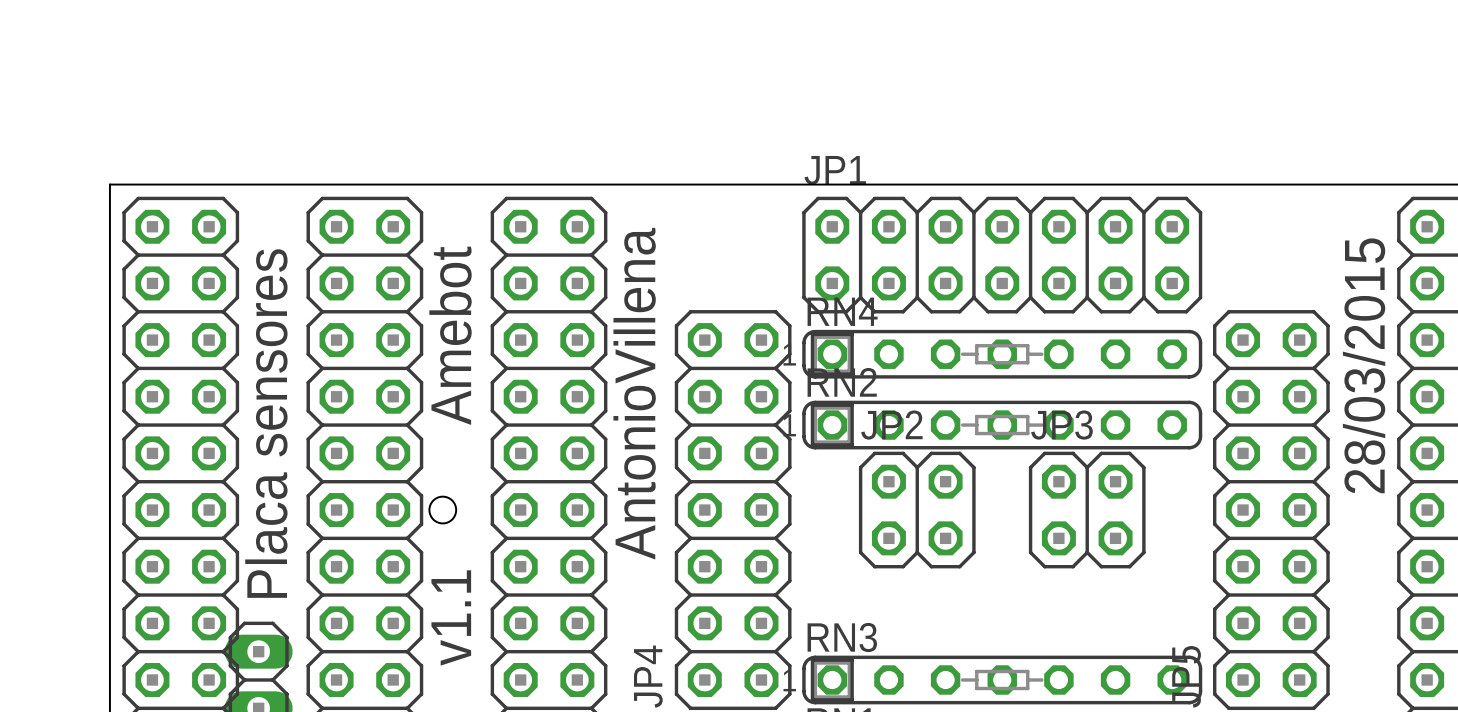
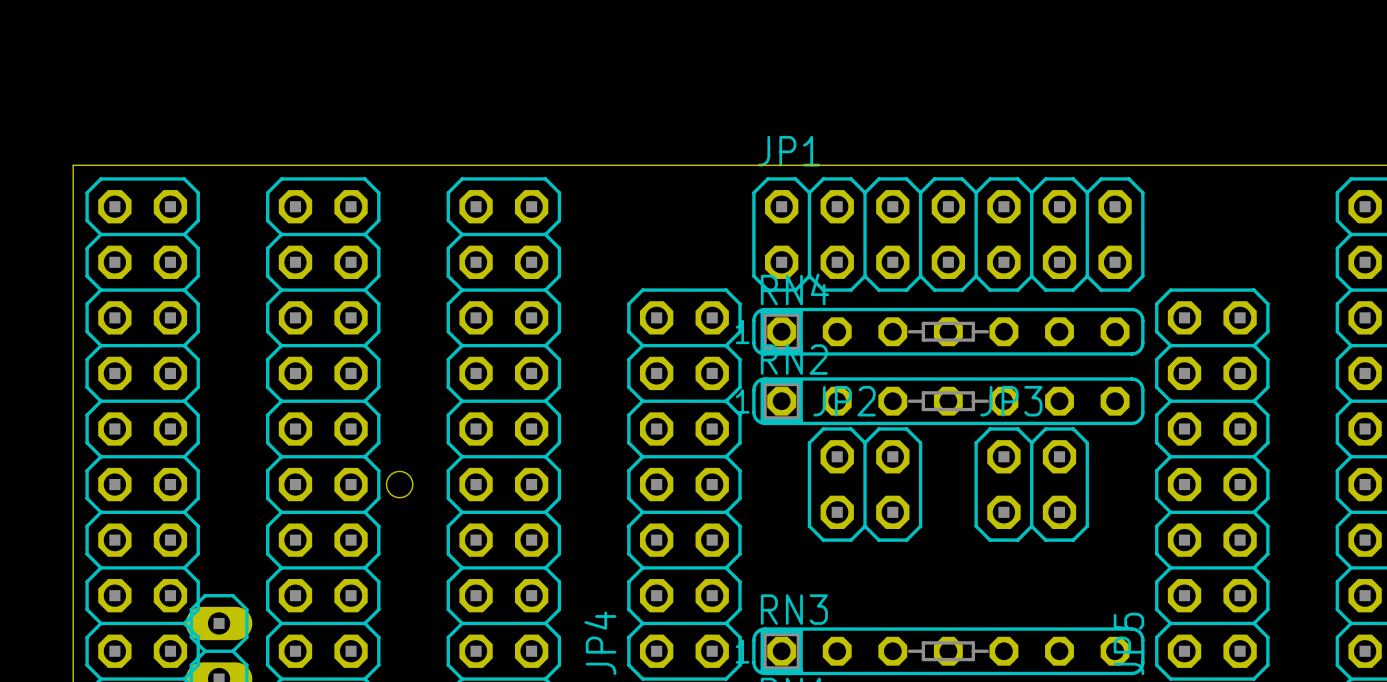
text: Amebot (450, 335) -> none
text: 28/03/2015 (1364, 365) -> none
text: AntonioVillena (634, 393) -> none
text: Placa sensores (266, 423) -> none
text: v1.1 (451, 617) -> none

